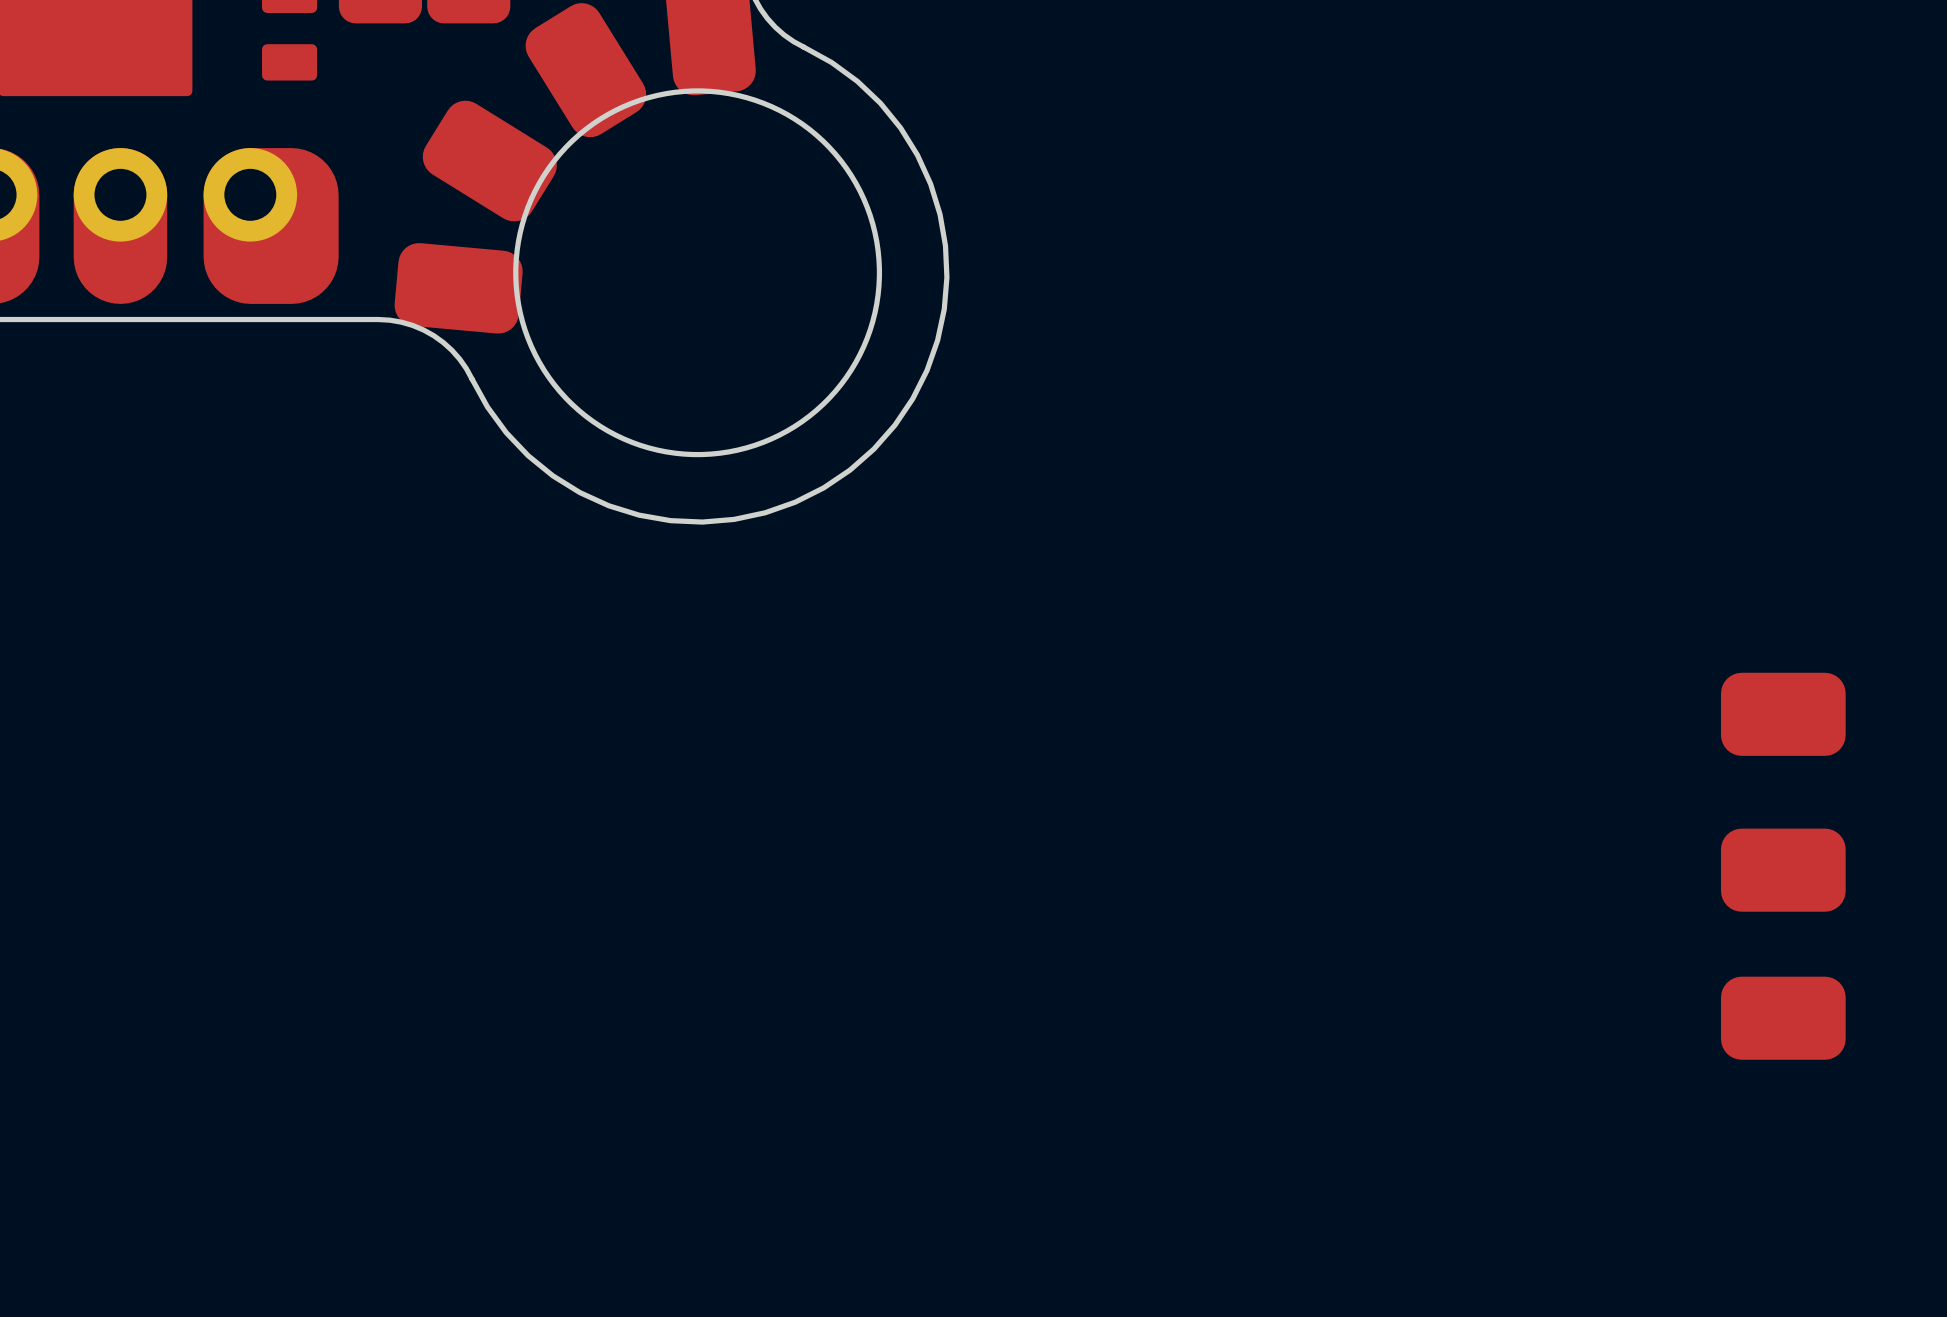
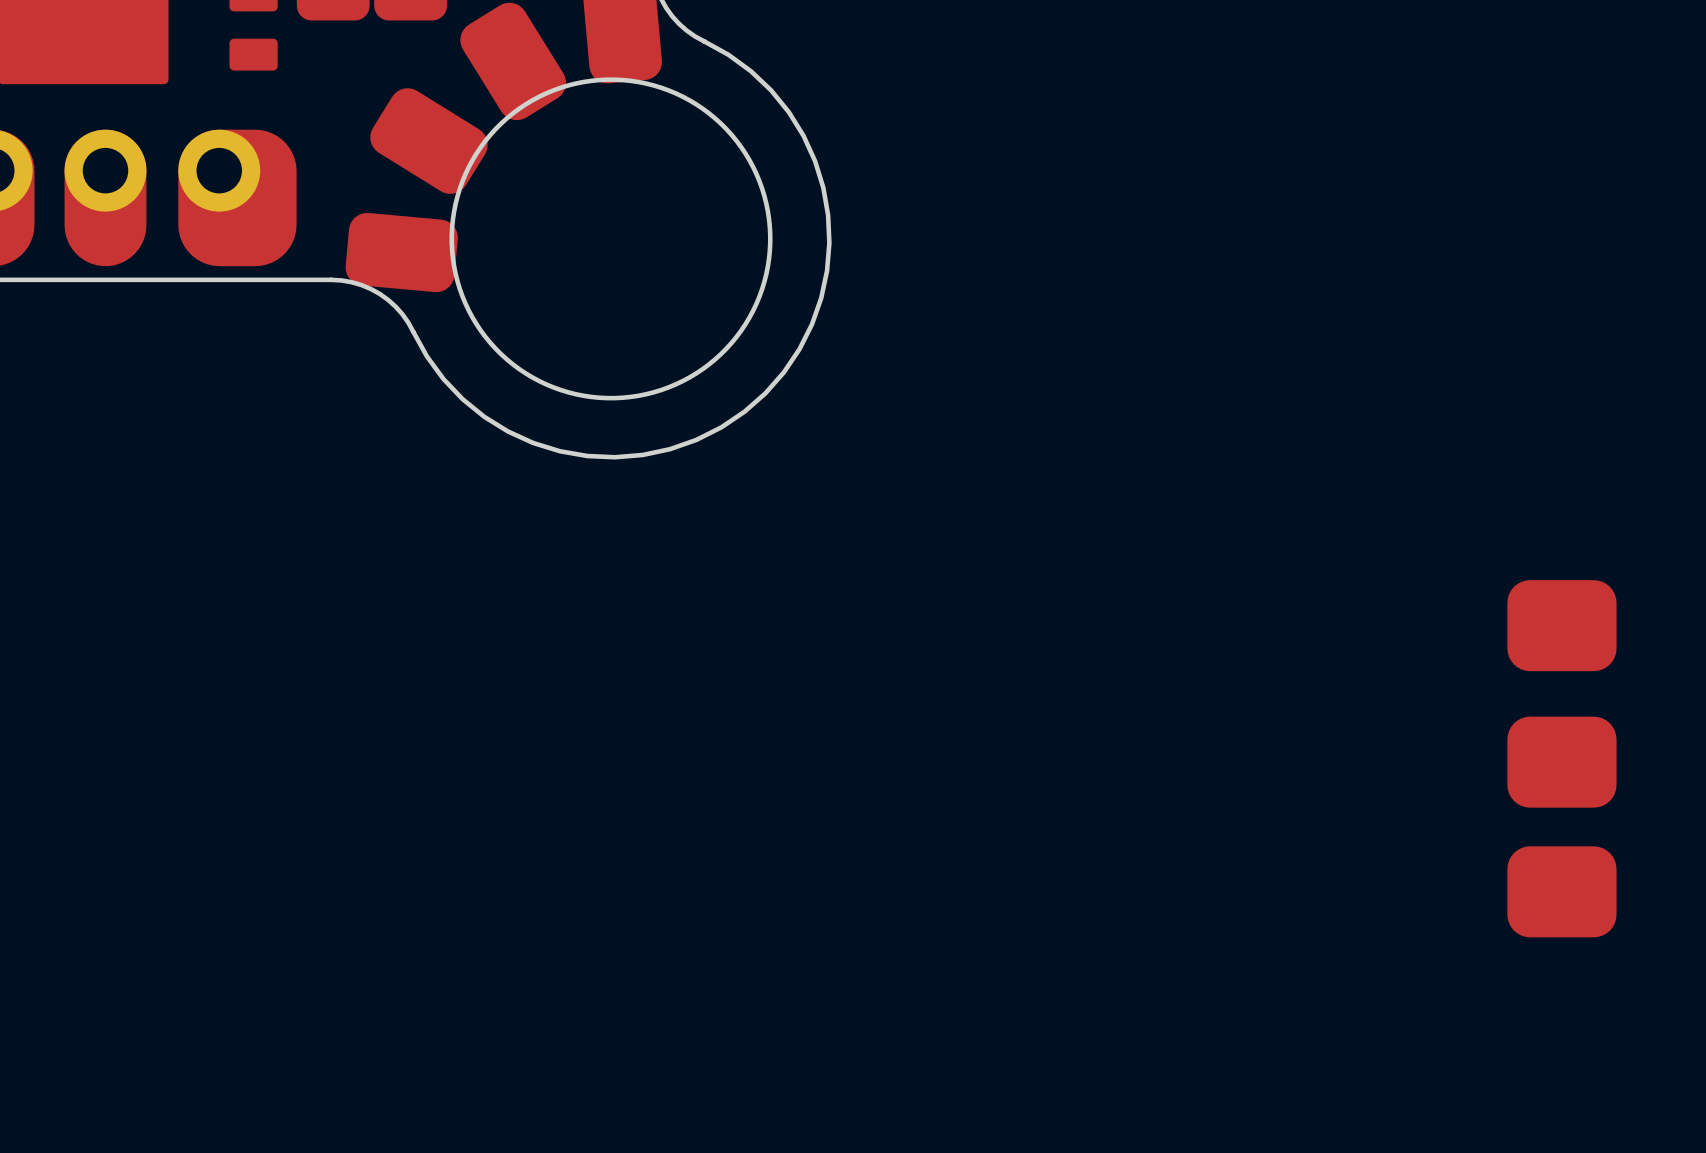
part footprint: [1721, 672, 1846, 756] -> [1507, 580, 1617, 672]
part footprint: [1721, 828, 1846, 912] -> [1507, 716, 1617, 808]
part footprint: [1721, 976, 1846, 1060] -> [1507, 846, 1617, 938]

